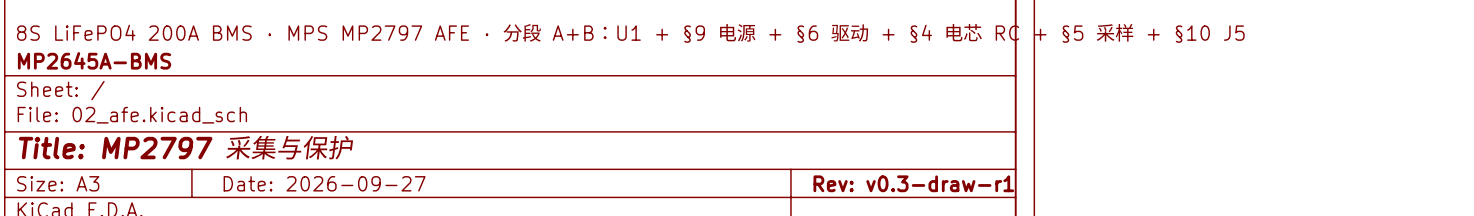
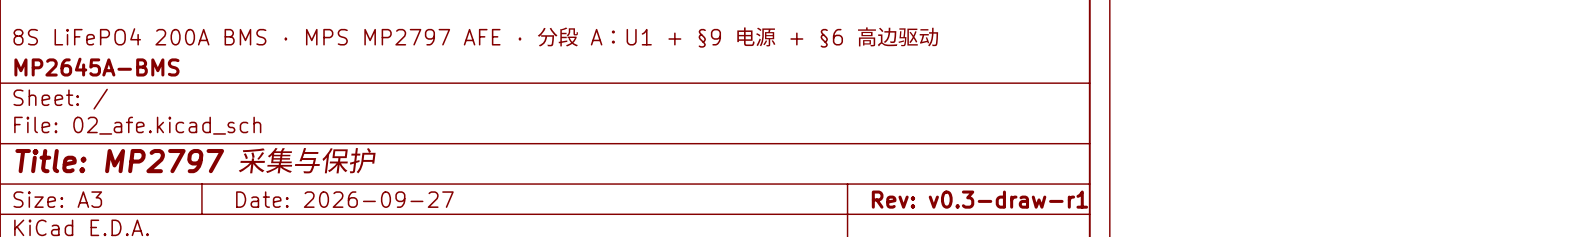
title block: 8S LiFePO4 200A BMS · MPS MP2797 AFE · 分段 A+B：U1 + §9 电源 + §6 驱动 + §4 电芯 RC + §5 采样 + §10 J5 (630, 33) -> 8S LiFePO4 200A BMS · MPS MP2797 AFE · 分段 A：U1 + §9 电源 + §6 高边驱动 (476, 37)

